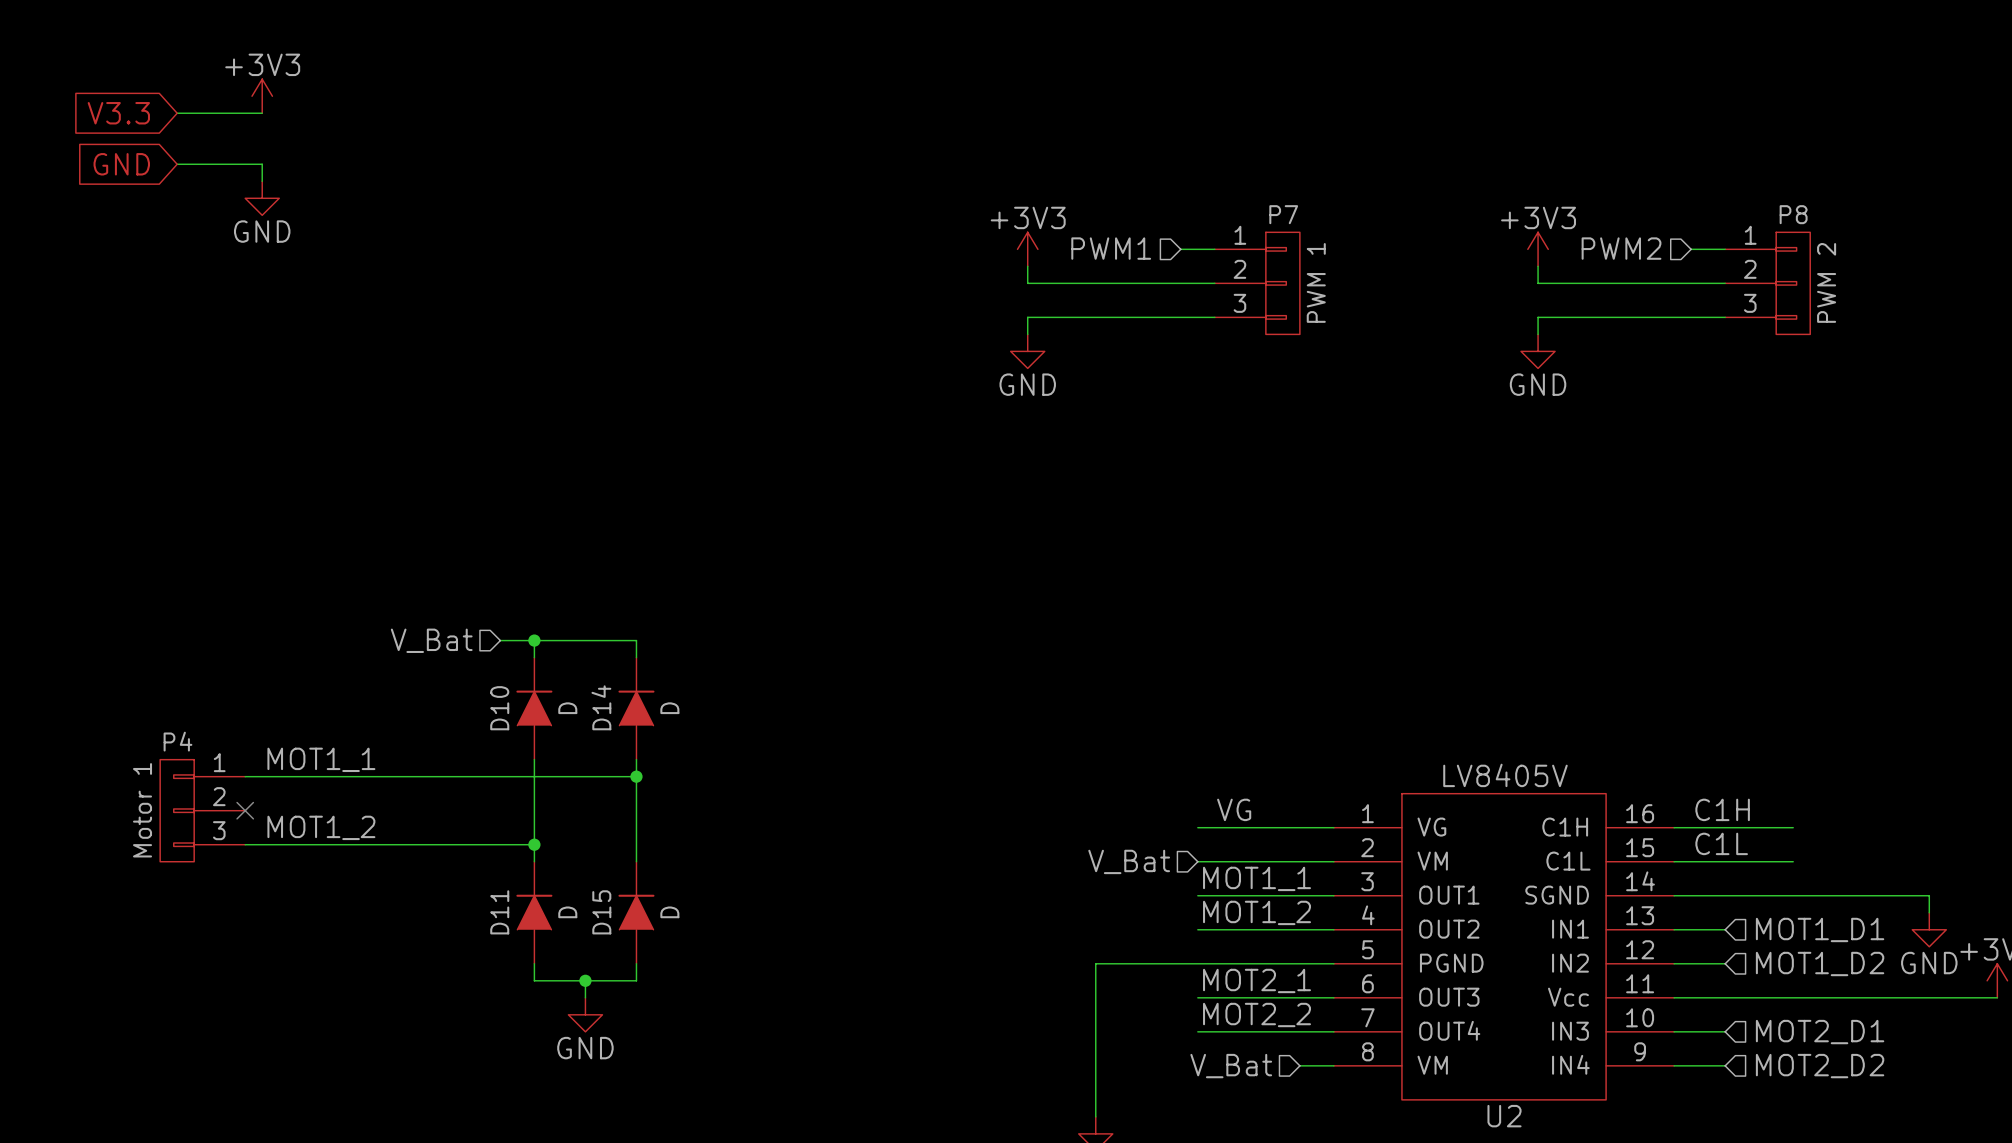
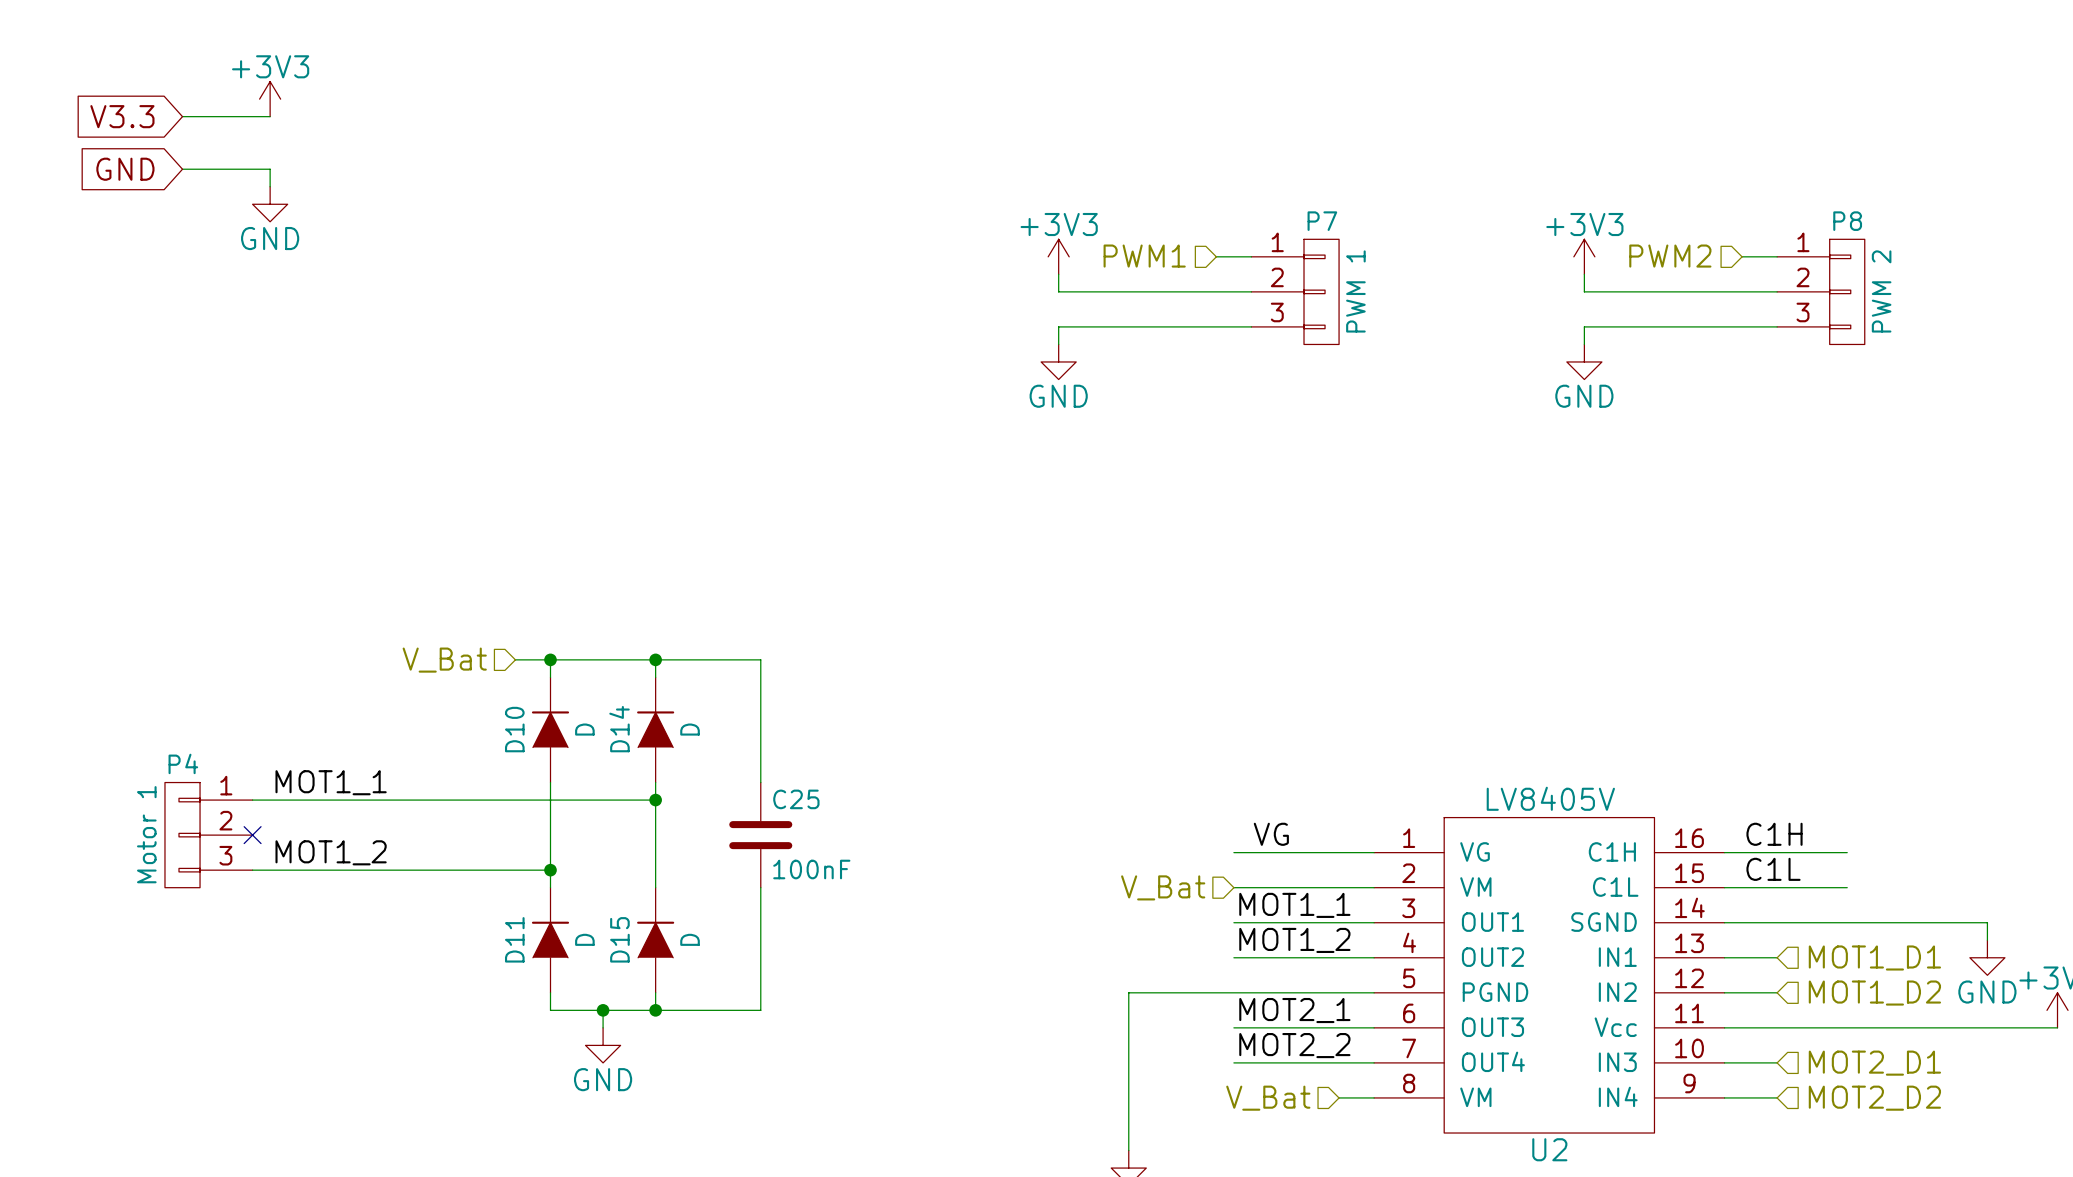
wire: none -> (655, 659) (760, 659) (760, 782)
junction: none -> (655, 659)
C25: none -> 100nF (760, 835)
wire: none -> (760, 887) (760, 1010) (655, 1010)
junction: none -> (655, 1010)

